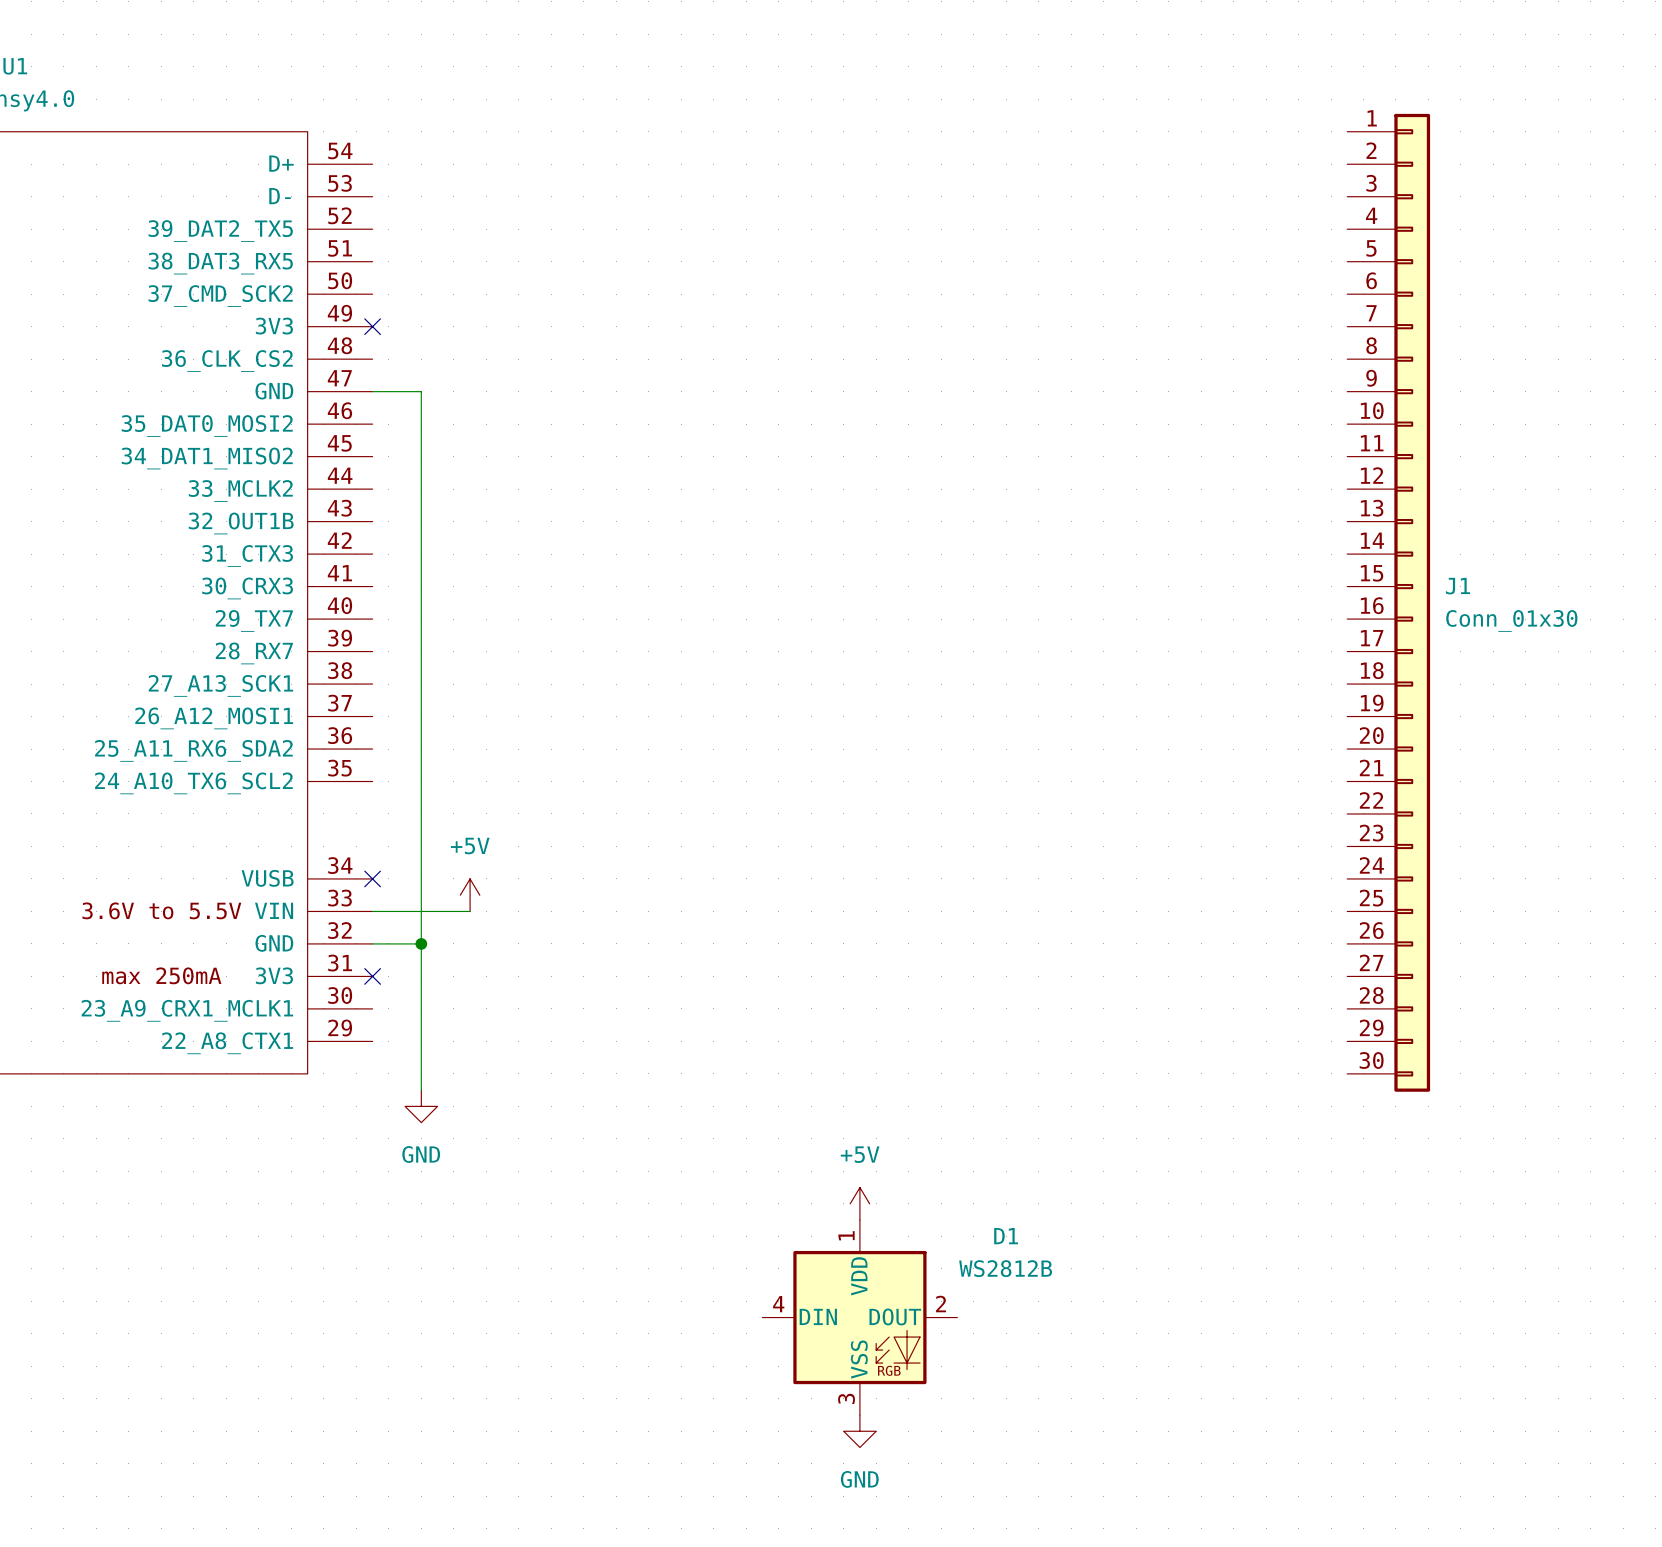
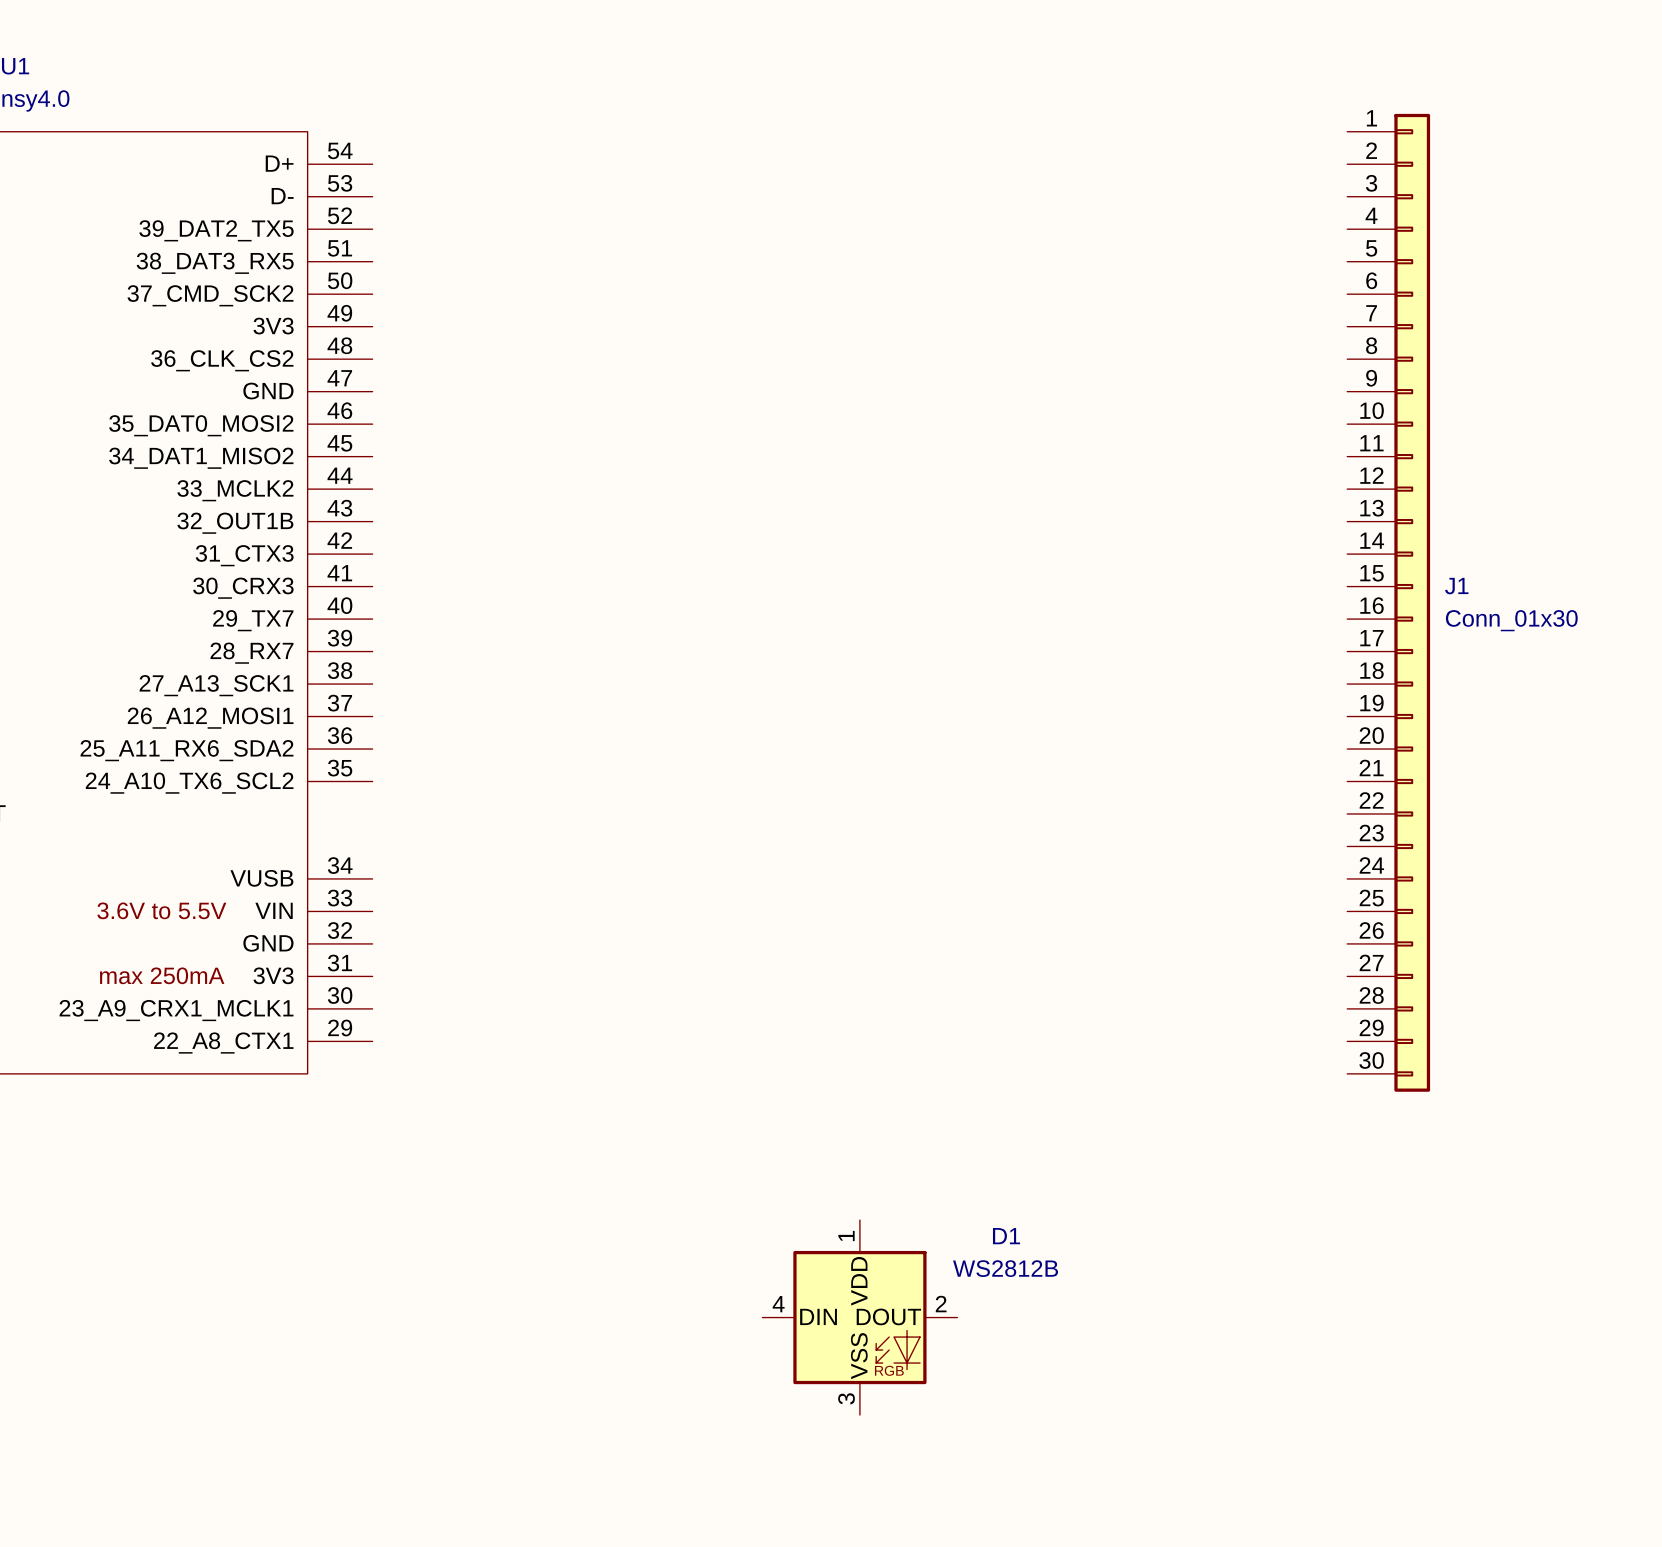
no-connect mark: (372, 326) -> none
wire: (372, 391) (421, 391) (421, 1090) -> none
no-connect mark: (372, 878) -> none
power symbol: +5V (470, 895) -> none
wire: (372, 911) (470, 911) -> none
wire: (372, 943) (421, 943) -> none
junction: (421, 943) -> none
no-connect mark: (372, 976) -> none
power symbol: GND (421, 1106) -> none
power symbol: +5V (859, 1203) -> none
power symbol: GND (859, 1431) -> none

